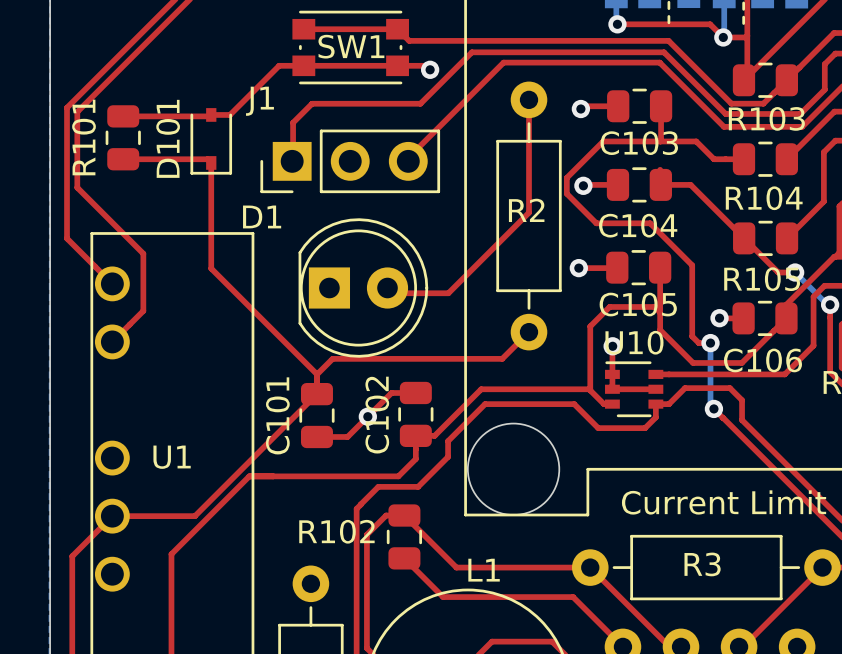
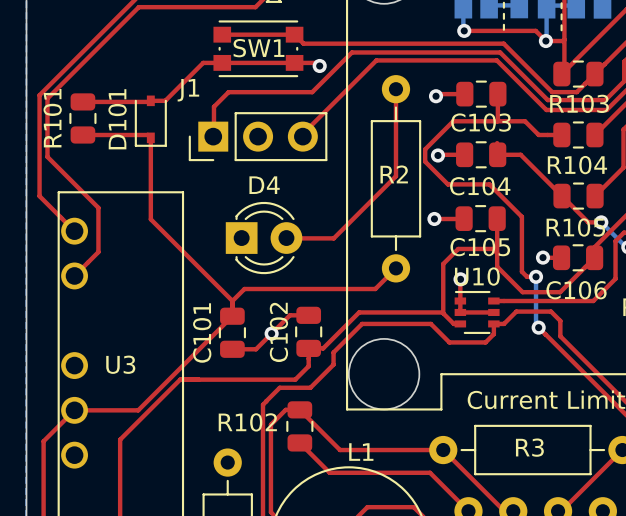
D1: (363, 288) -> none
D4: none -> (264, 238)
U1 name: U1 (172, 457) -> U3 (120, 364)

